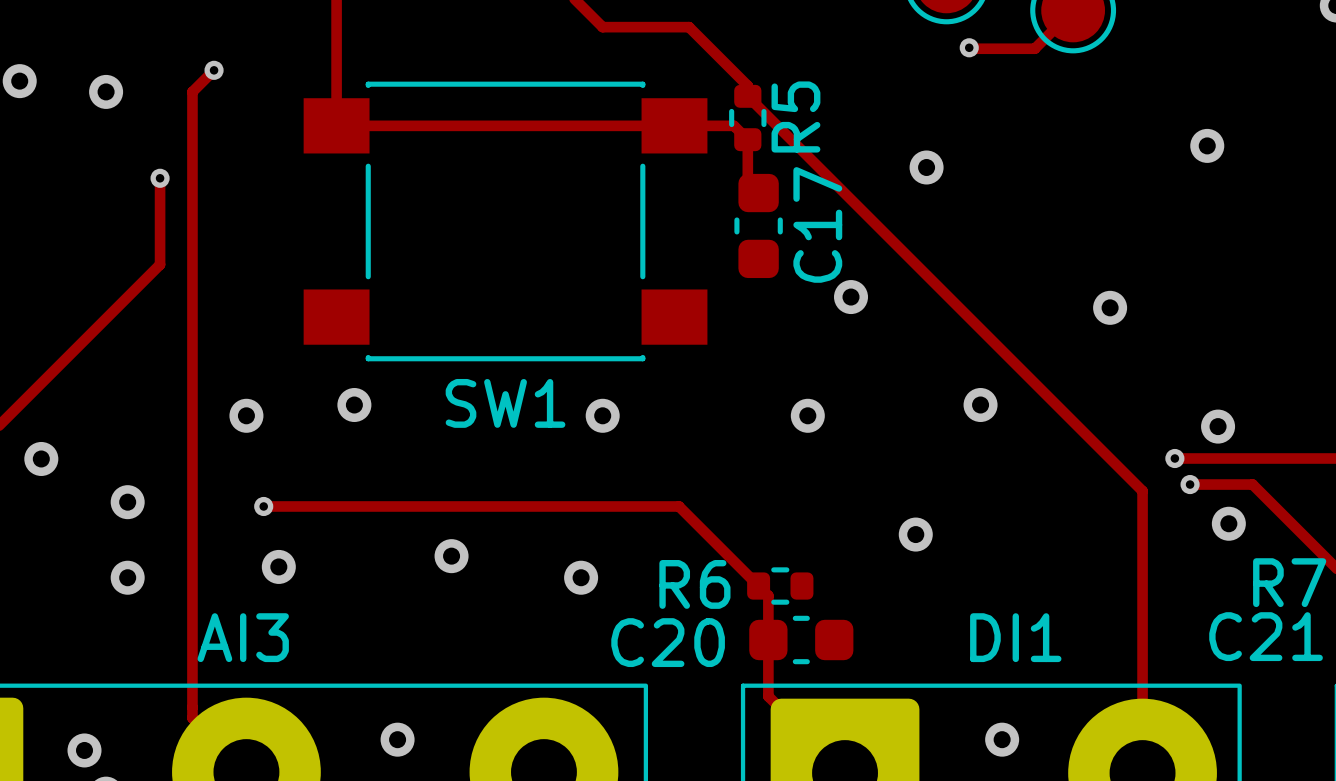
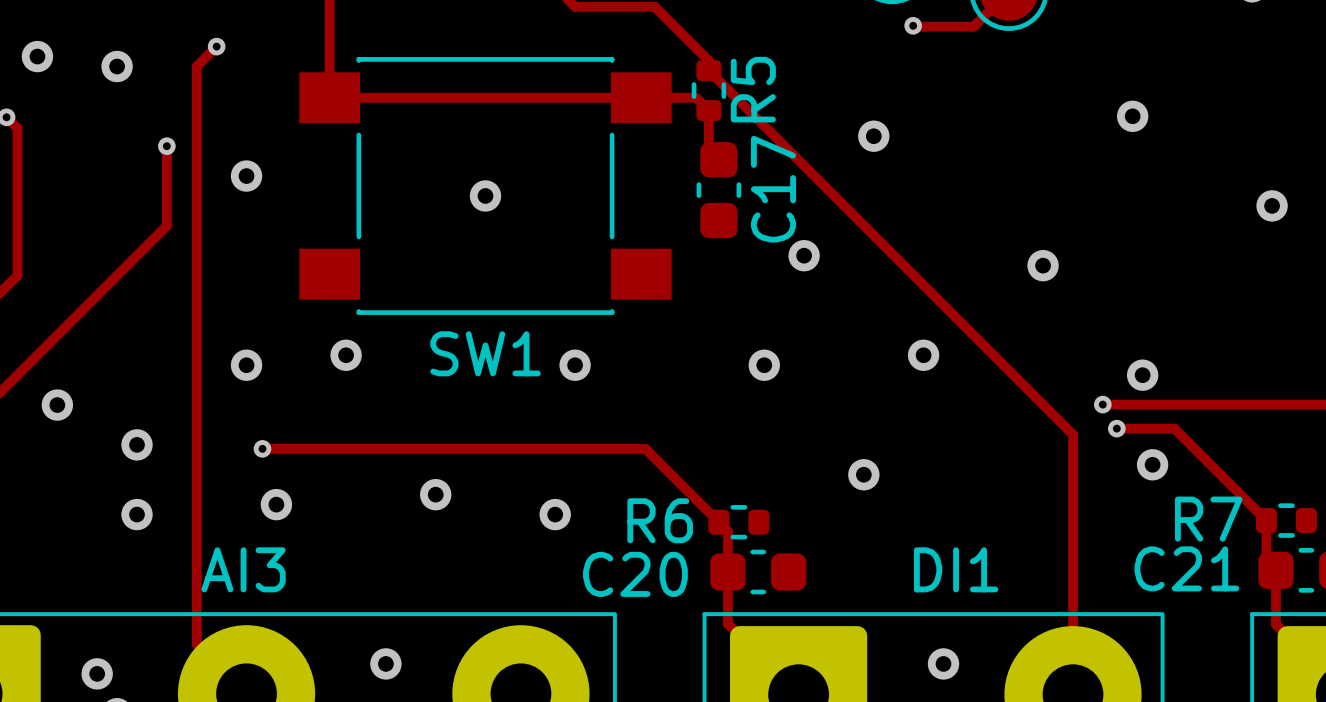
via: none -> (246, 176)
via: none -> (485, 195)

